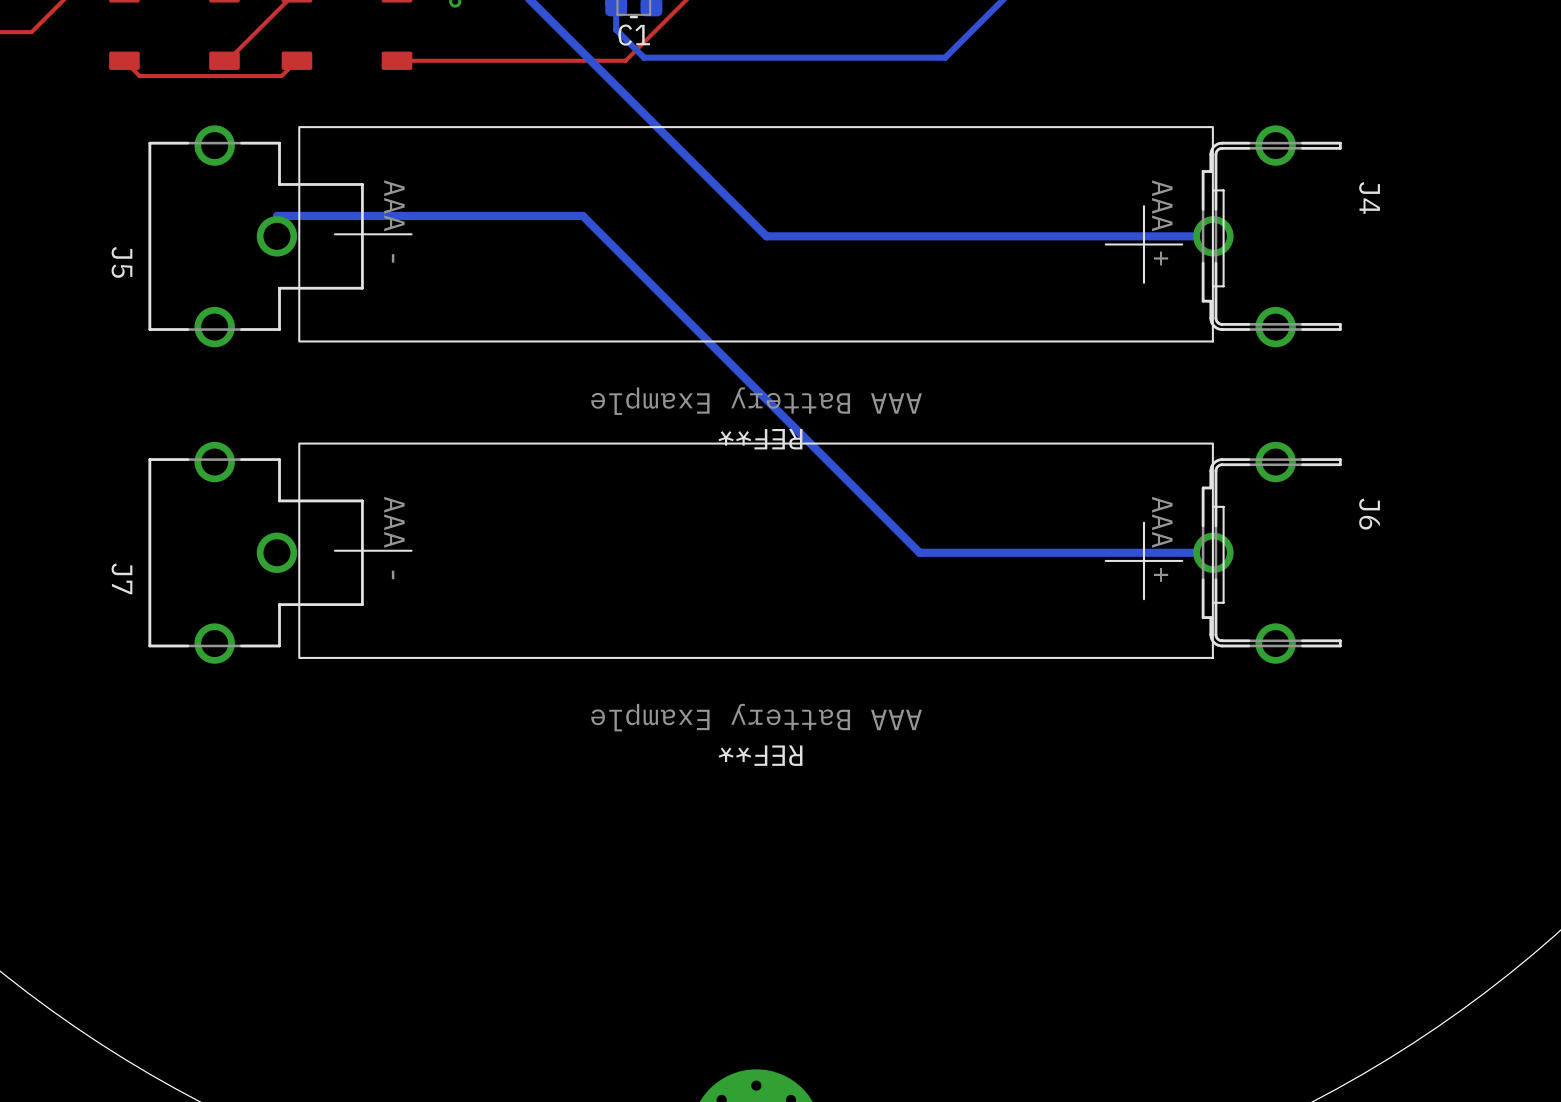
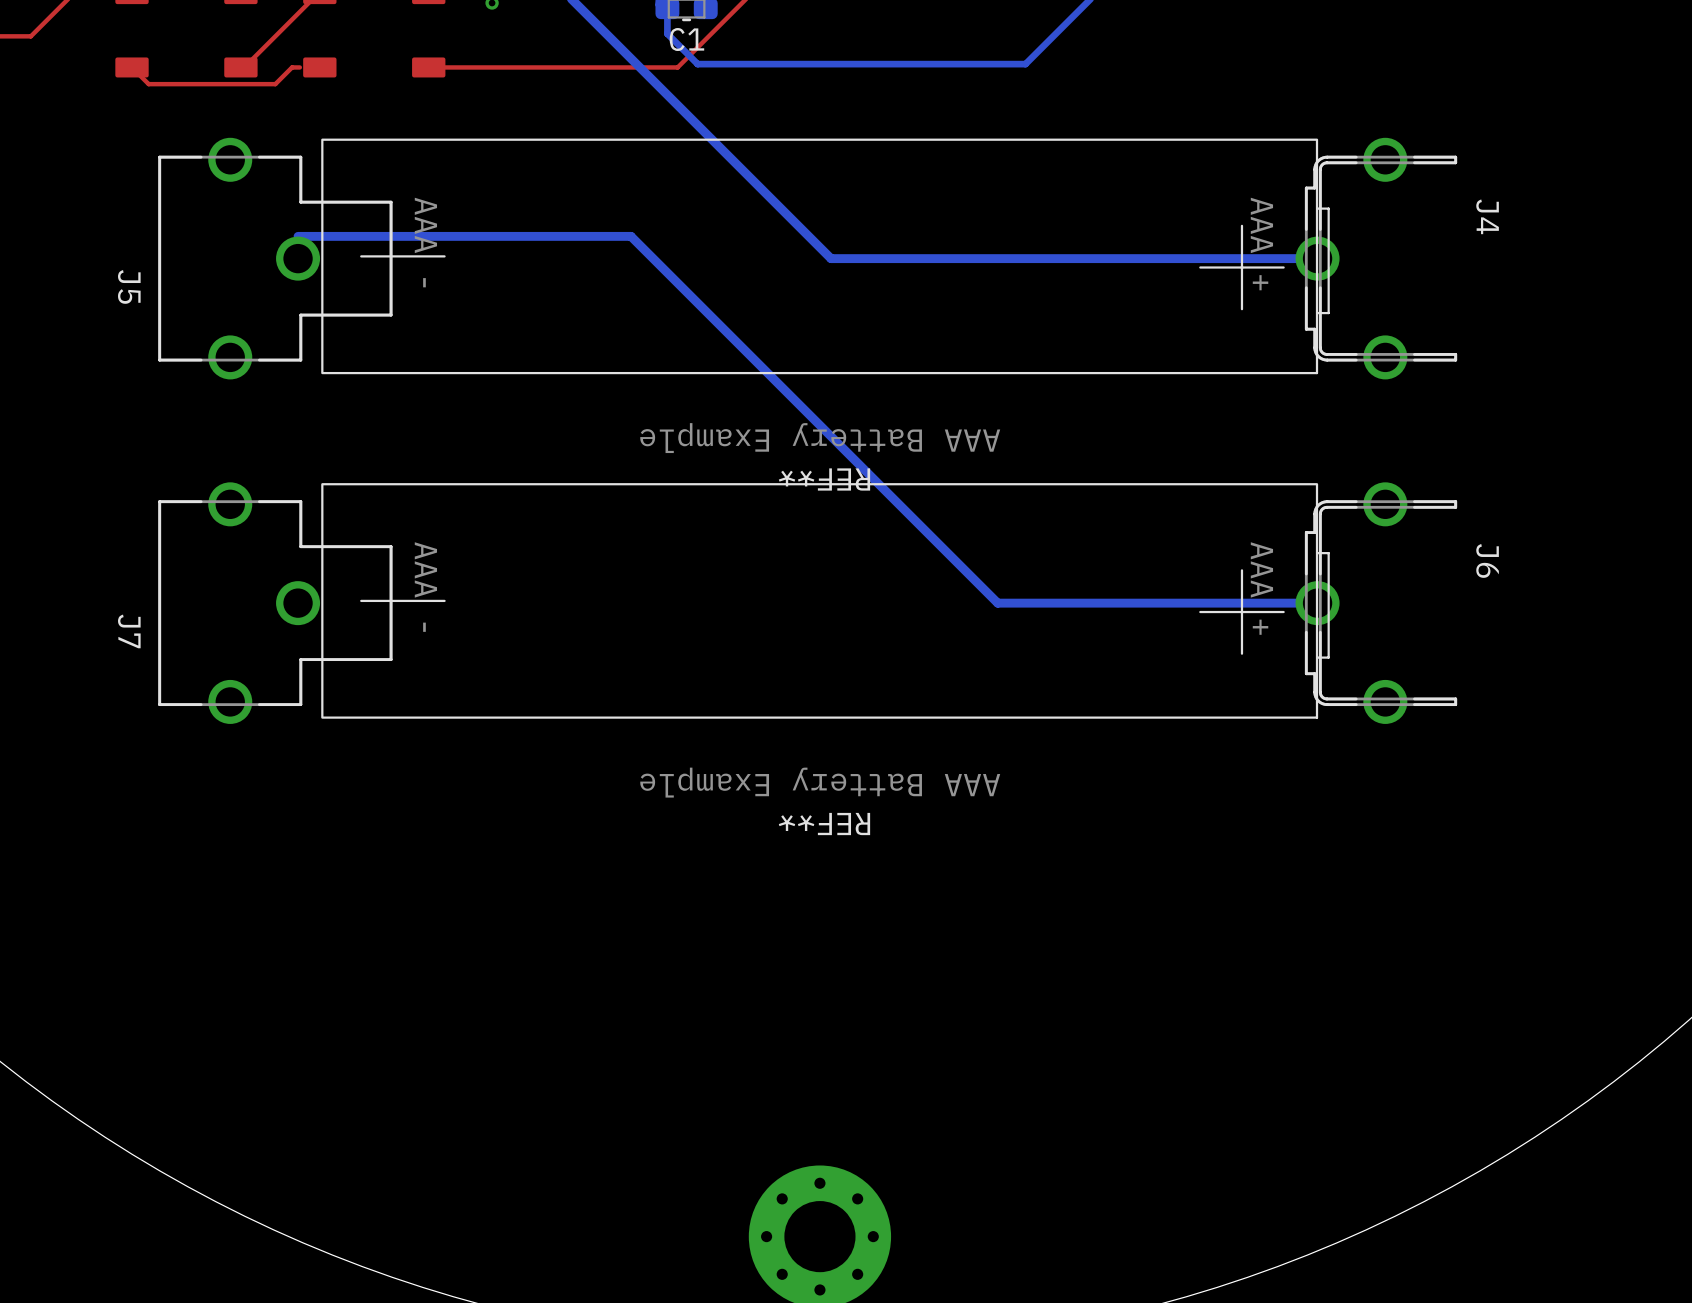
top track: (296, 60) (281, 76) (256, 76) -> (299, 67) (292, 67) (275, 84)

